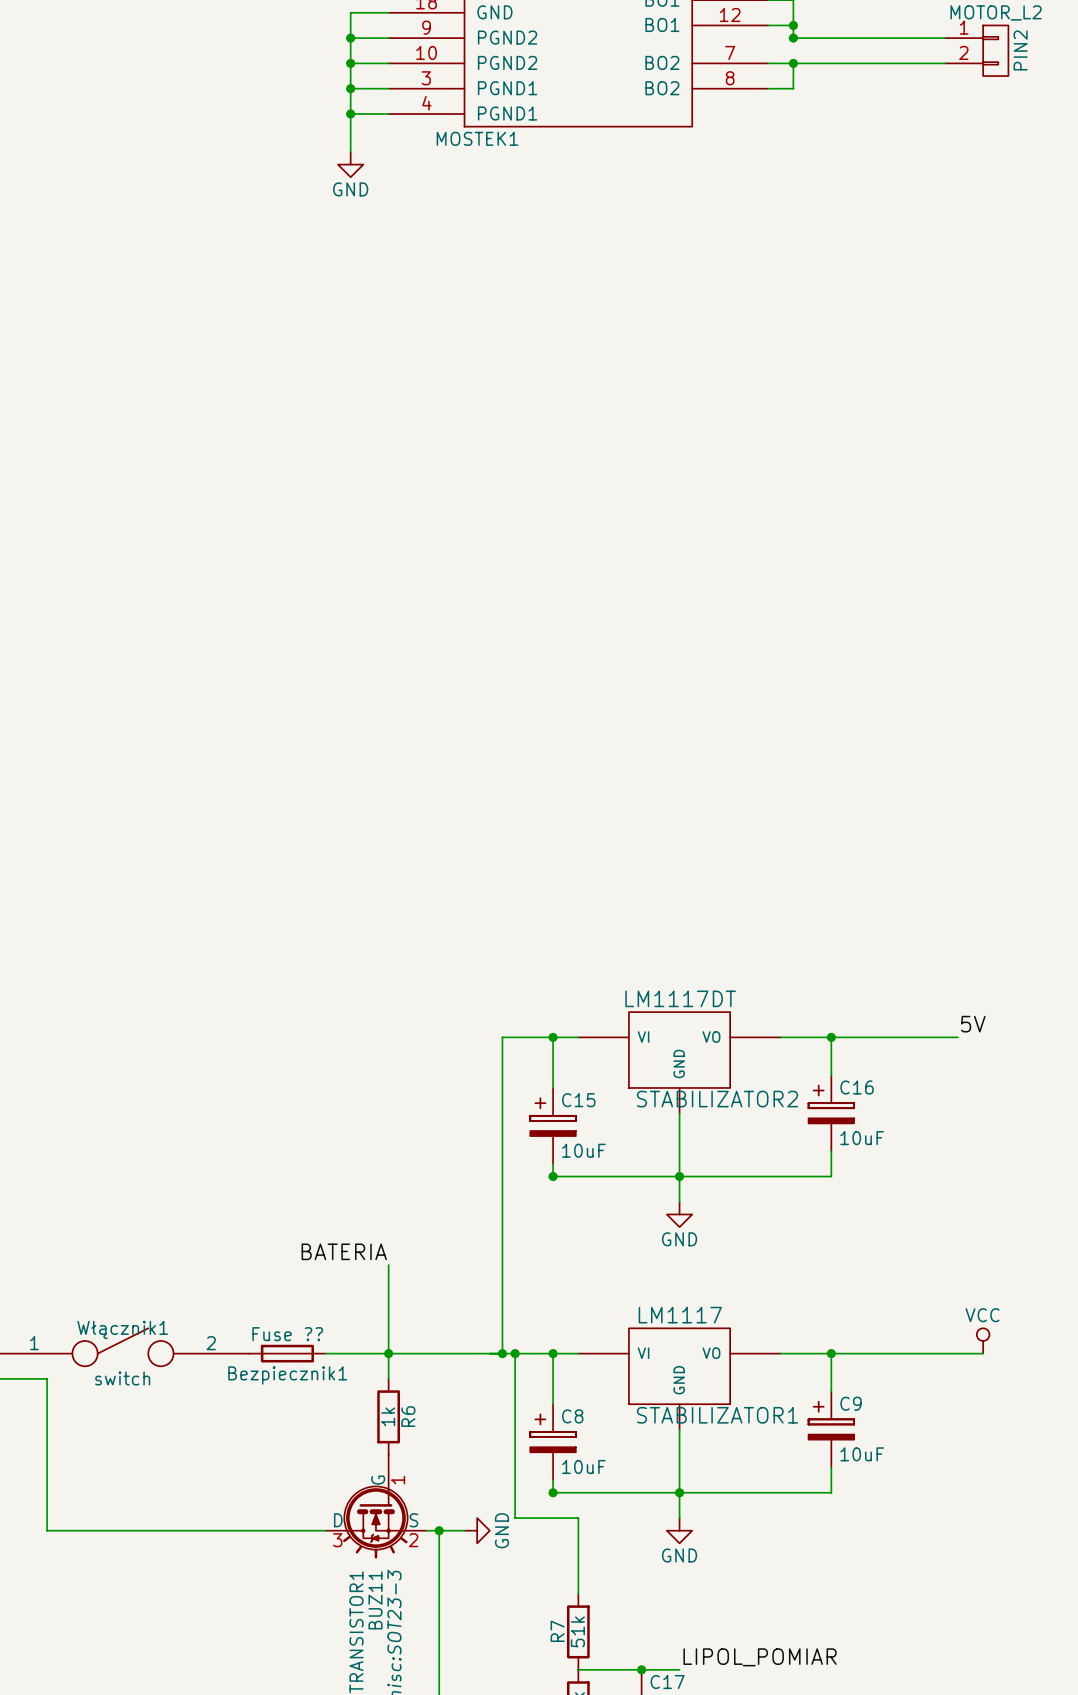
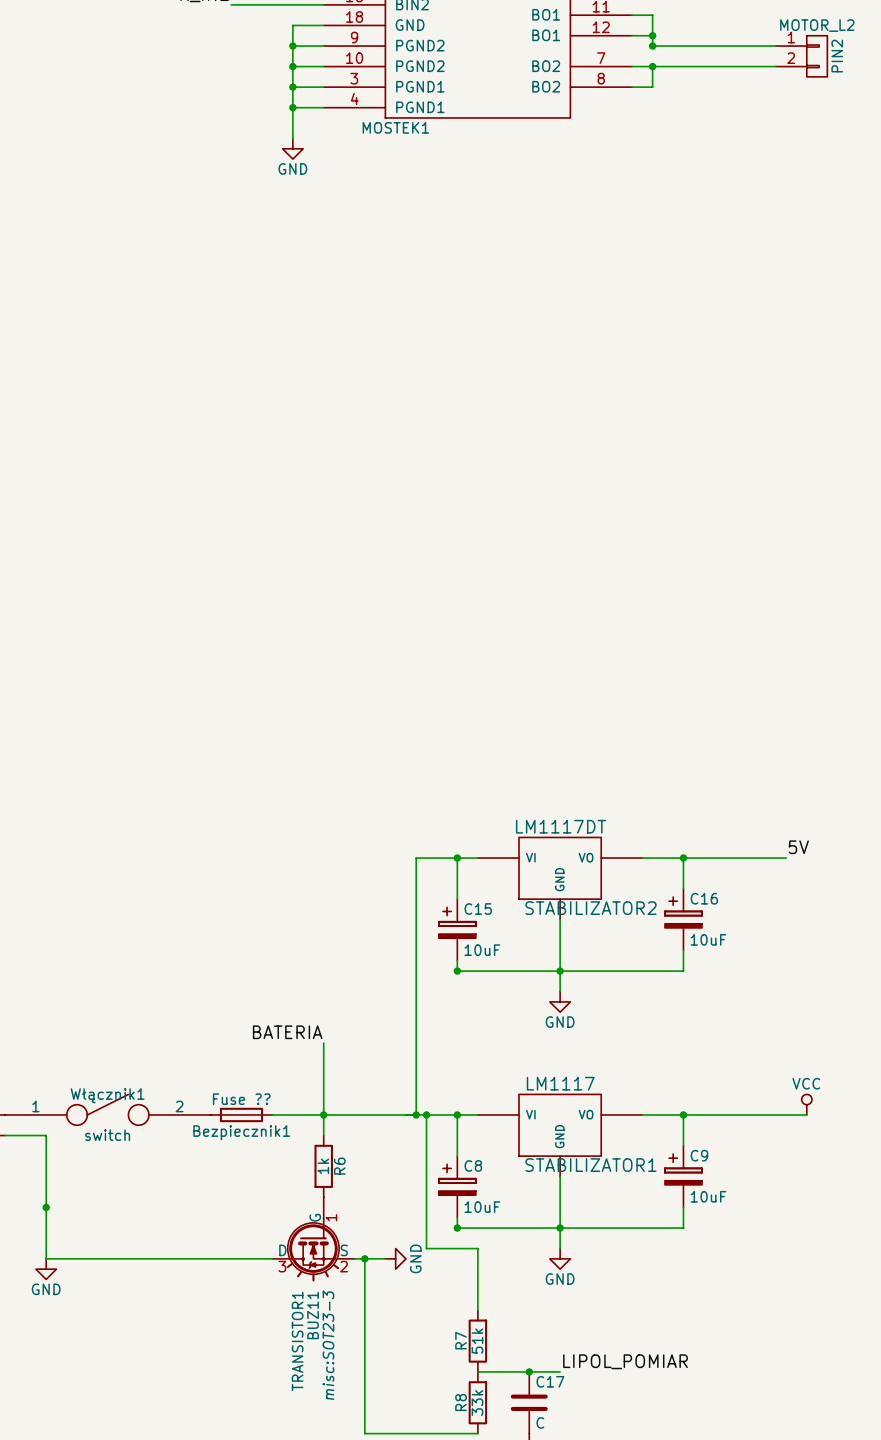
junction: none -> (46, 1207)
power symbol: none -> GND (46, 1269)

